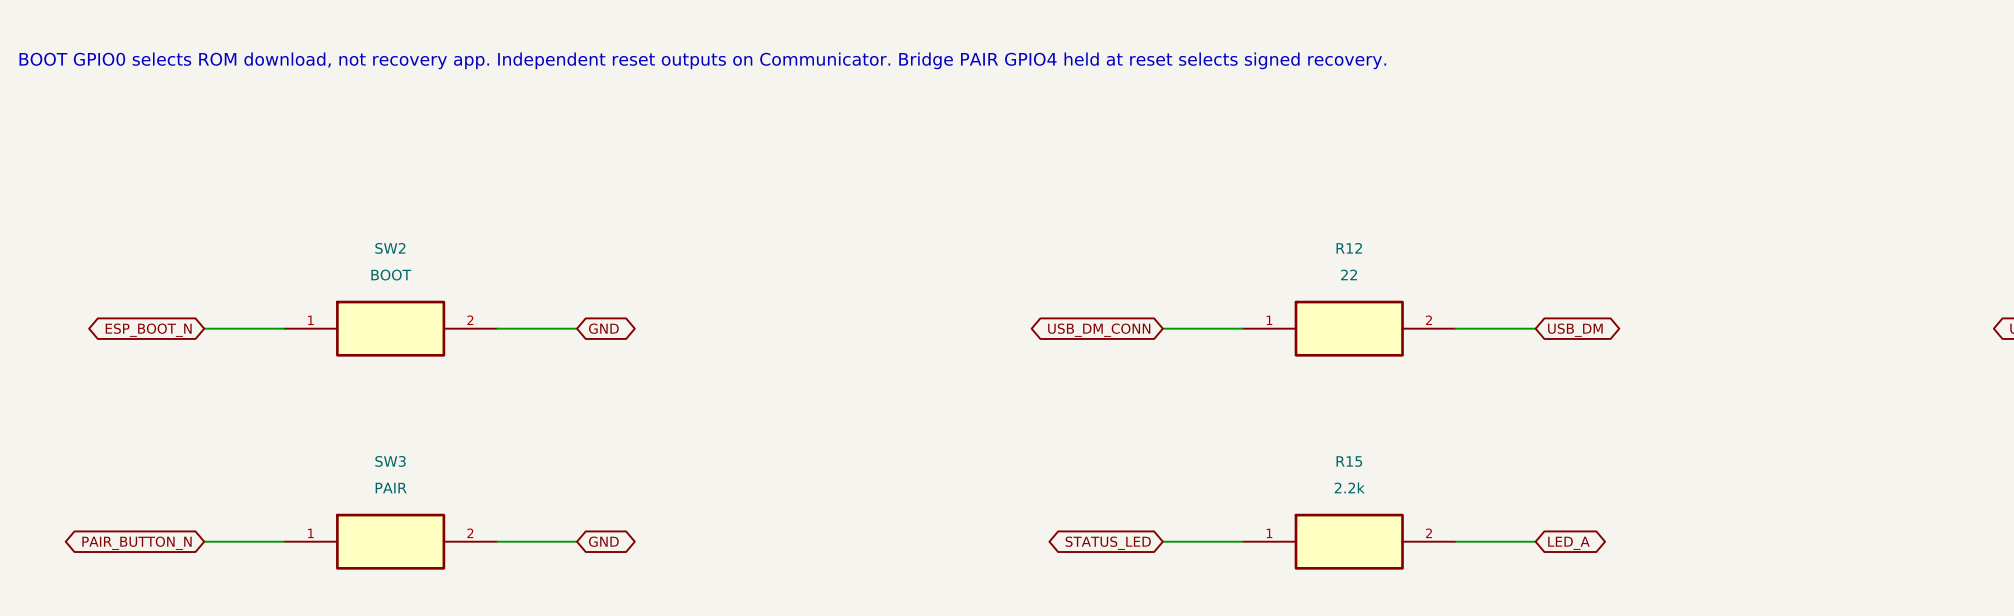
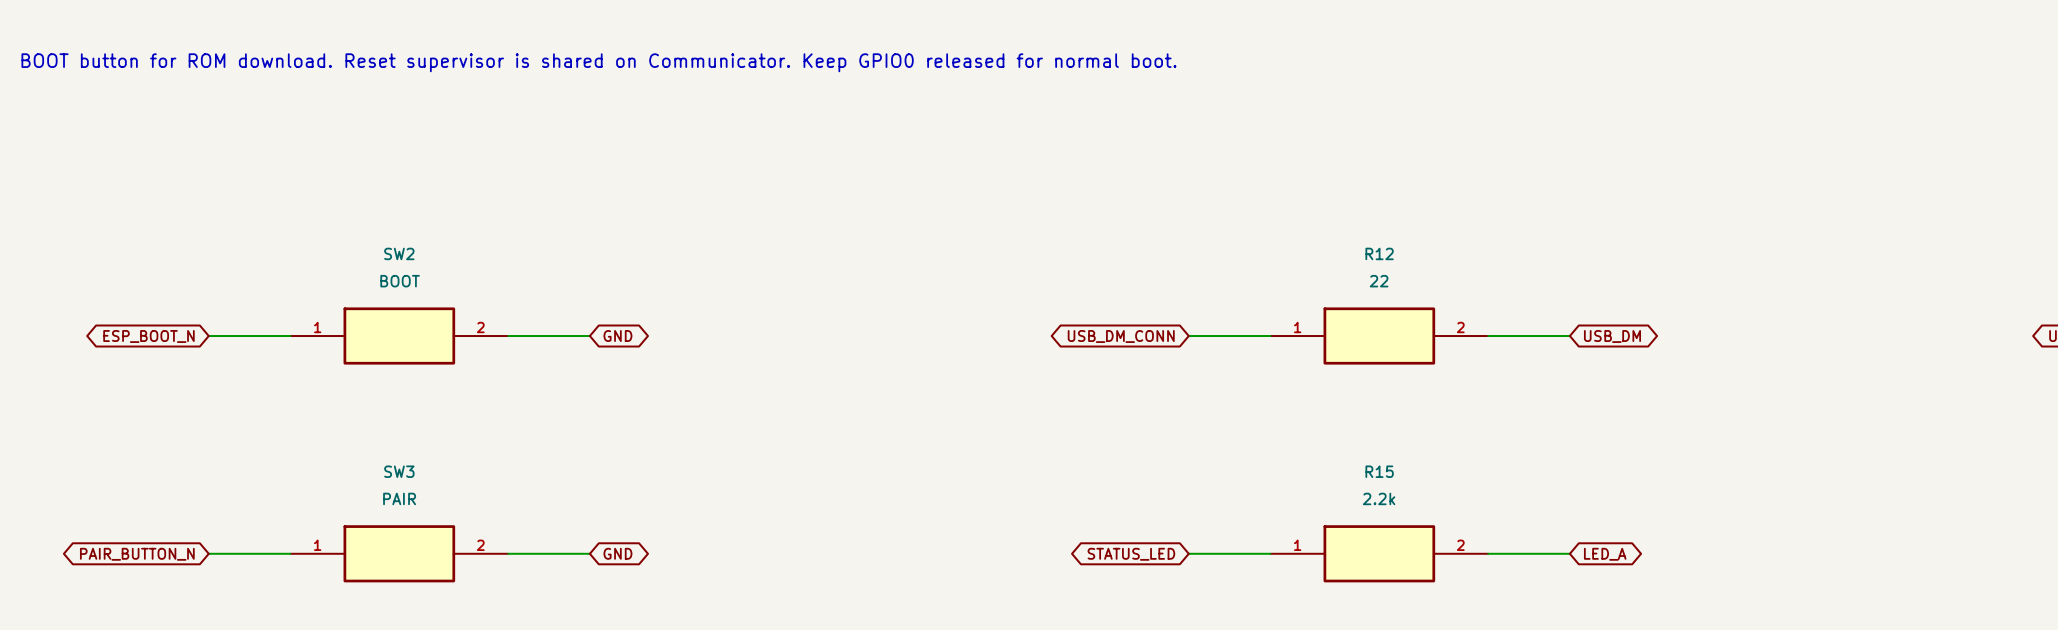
text: BOOT GPIO0 selects ROM download, not recovery app. Independent reset outputs on Communicator. Bridge PAIR GPIO4 held at reset selects signed recovery. (702, 60) -> BOOT button for ROM download. Reset supervisor is shared on Communicator. Keep GPIO0 released for normal boot. (598, 62)

